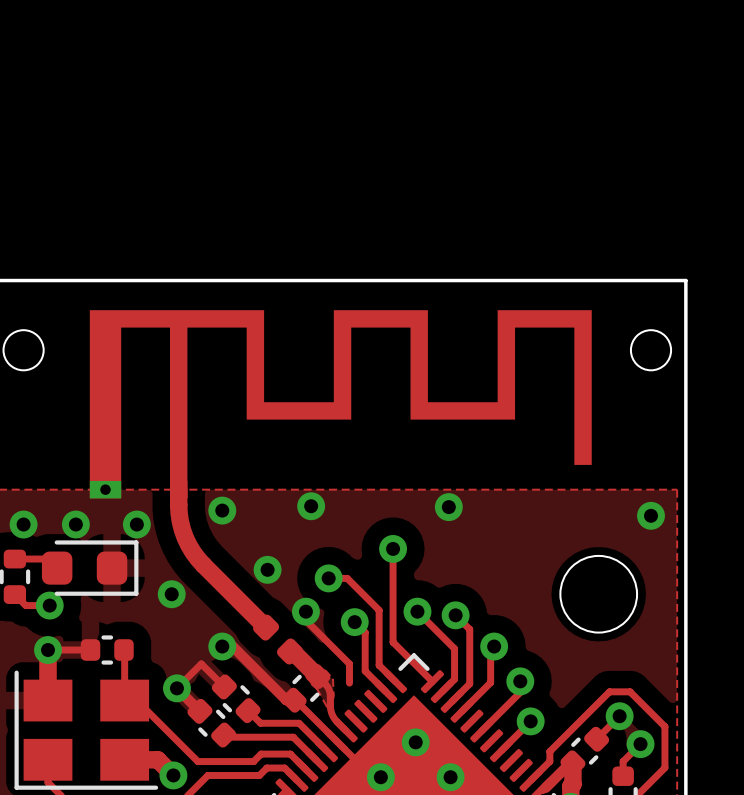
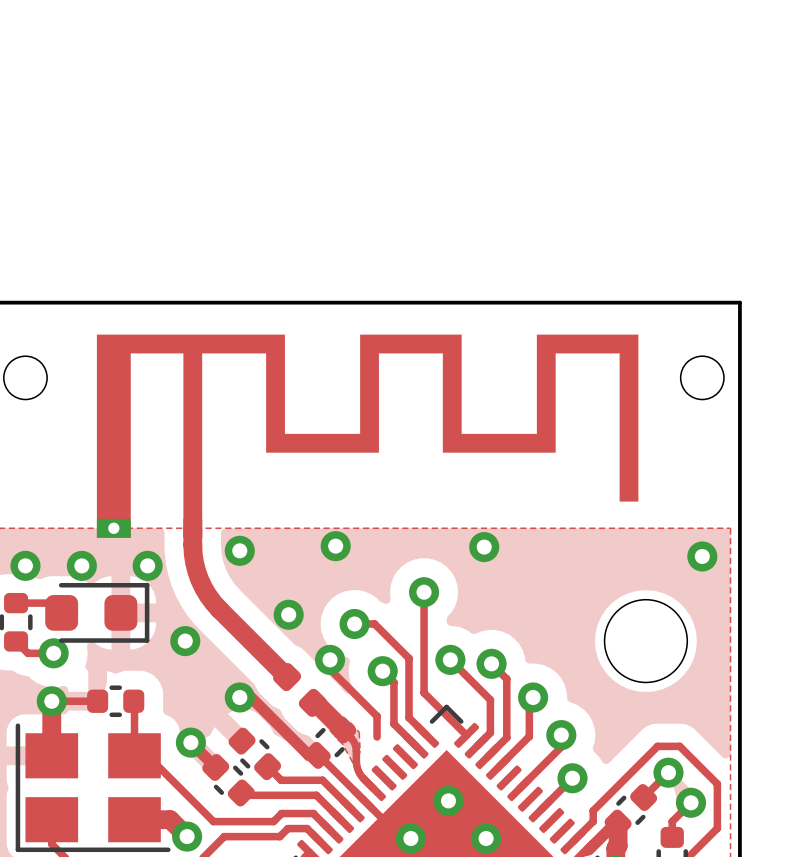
track: (224, 686) (201, 663) (176, 688) -> none

